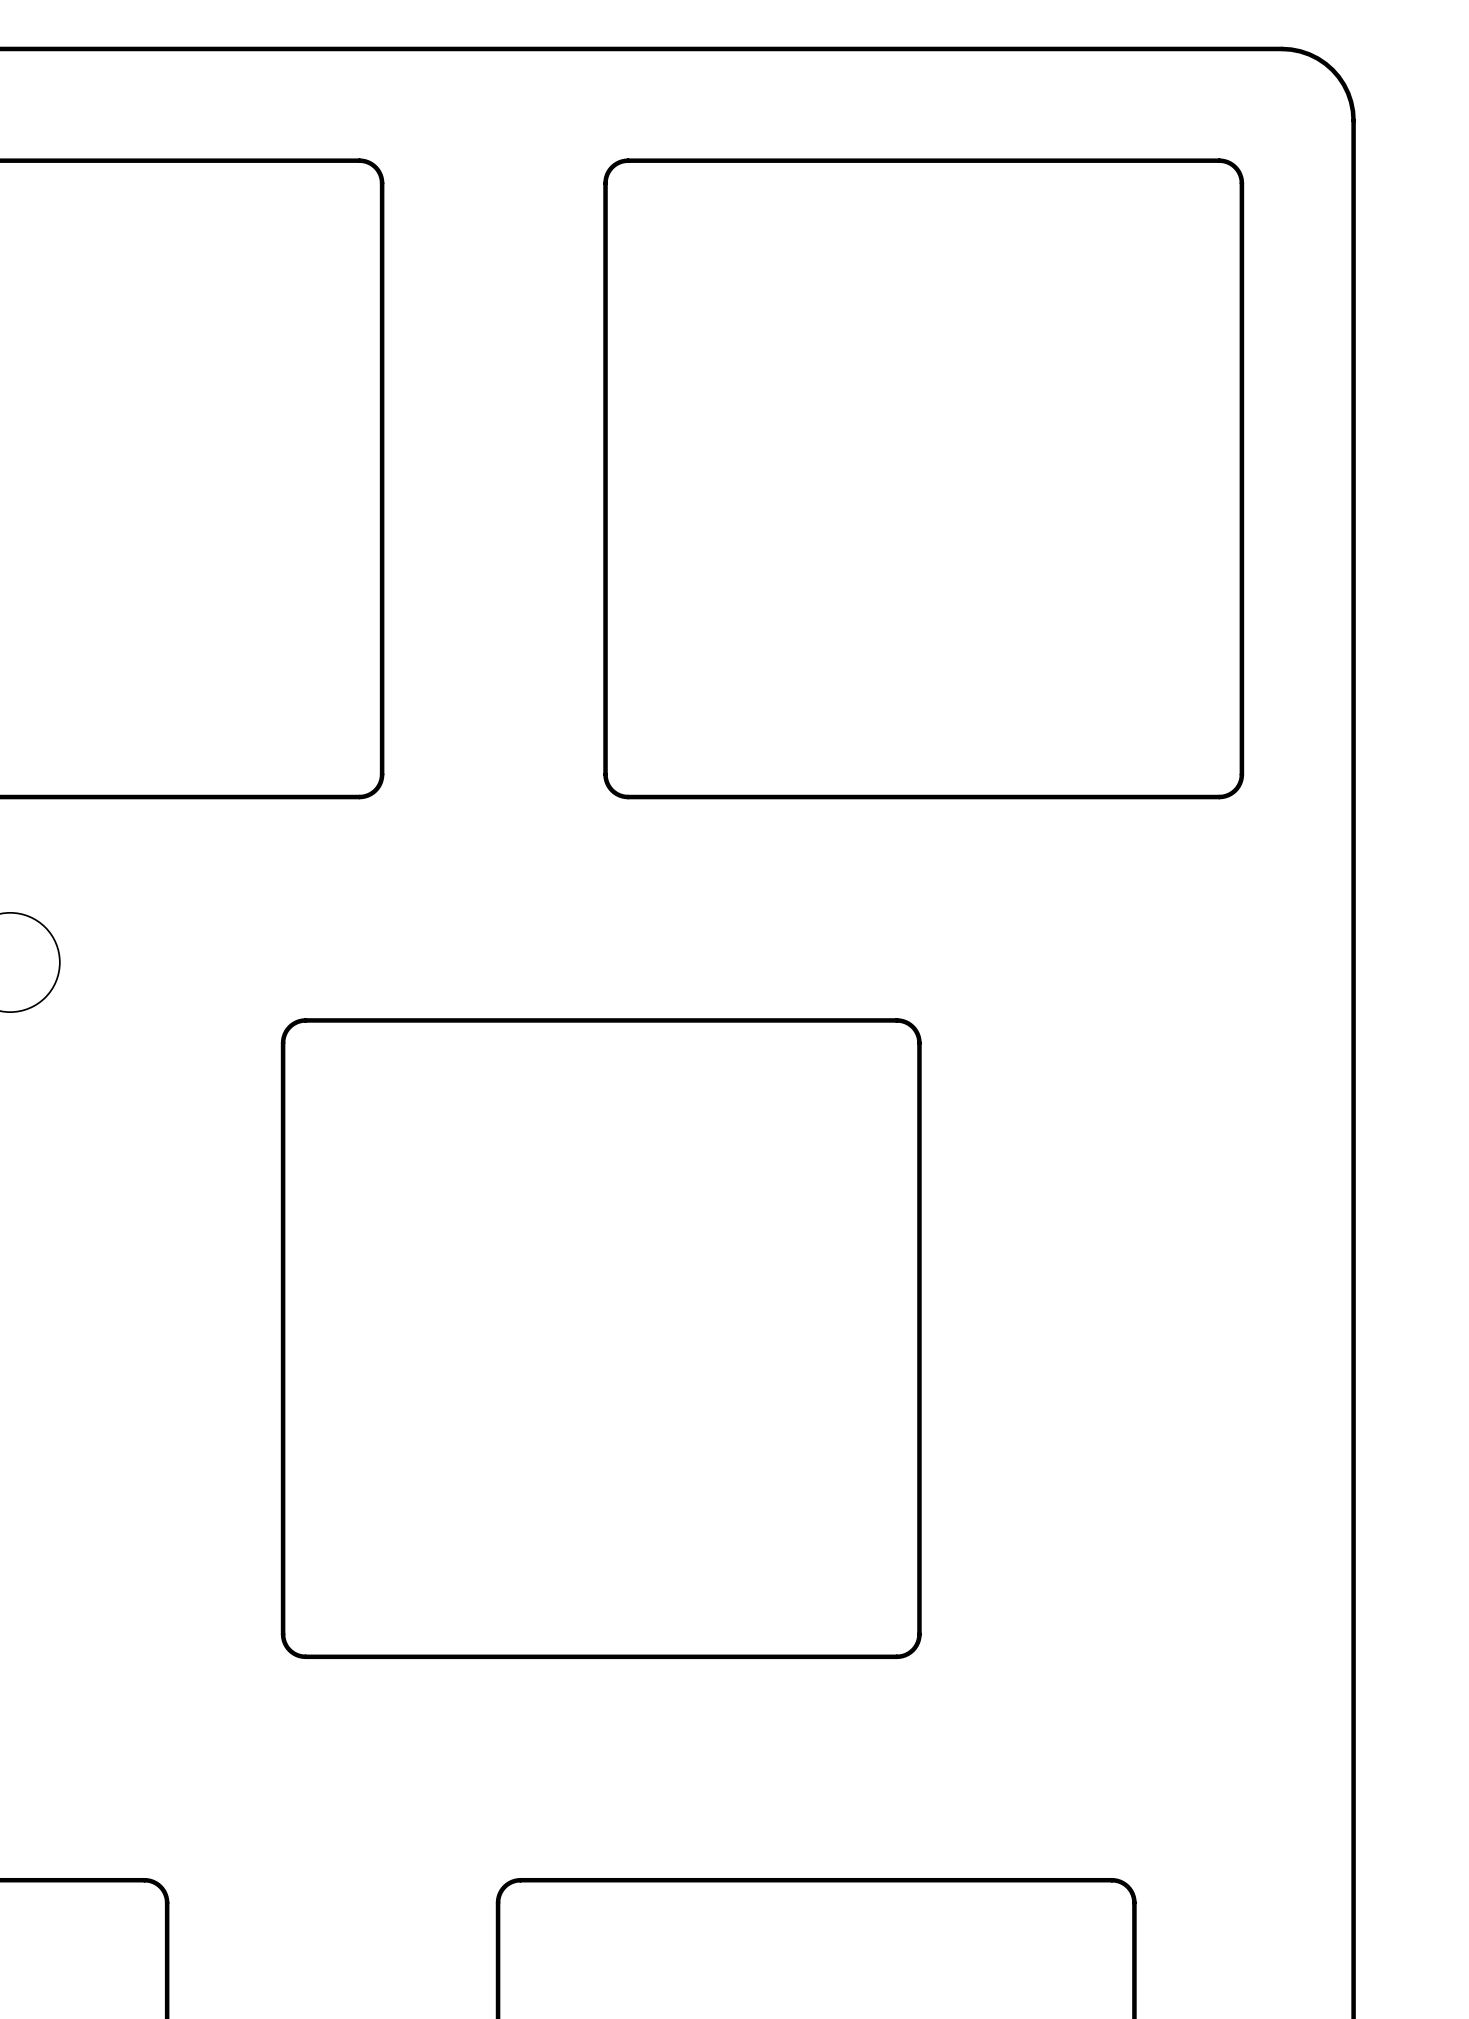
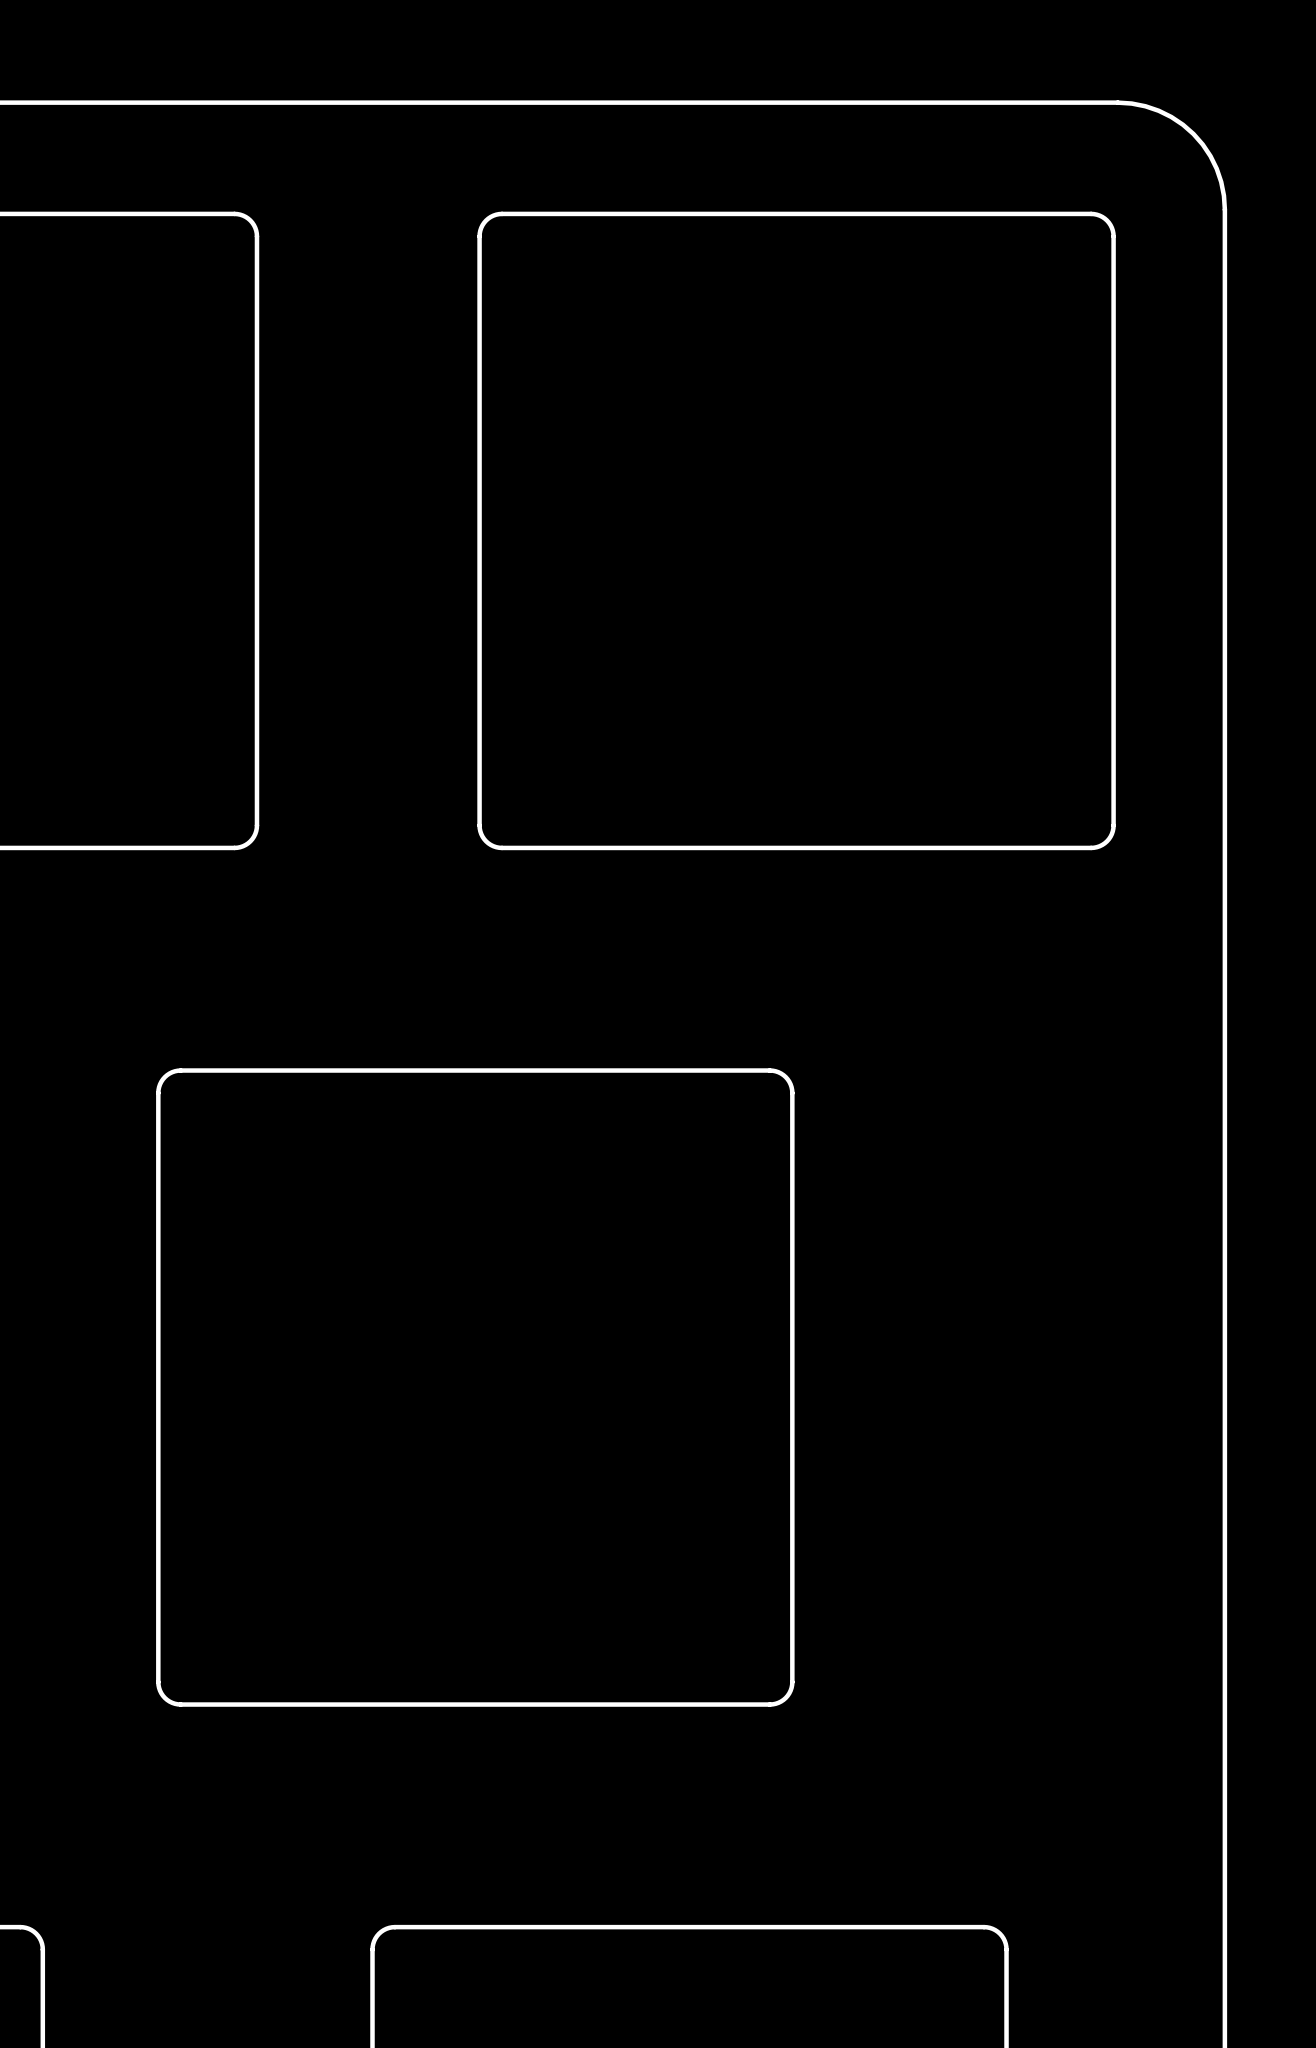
board edge: (1246, 48) (1281, 48) (1300, 51) (1317, 58) (1332, 69) (1343, 84) (1351, 102) (1353, 120) (1353, 156) -> (1117, 102) (1131, 103) (1158, 110) (1171, 116) (1193, 133) (1202, 144) (1216, 168) (1223, 195) (1224, 209)

